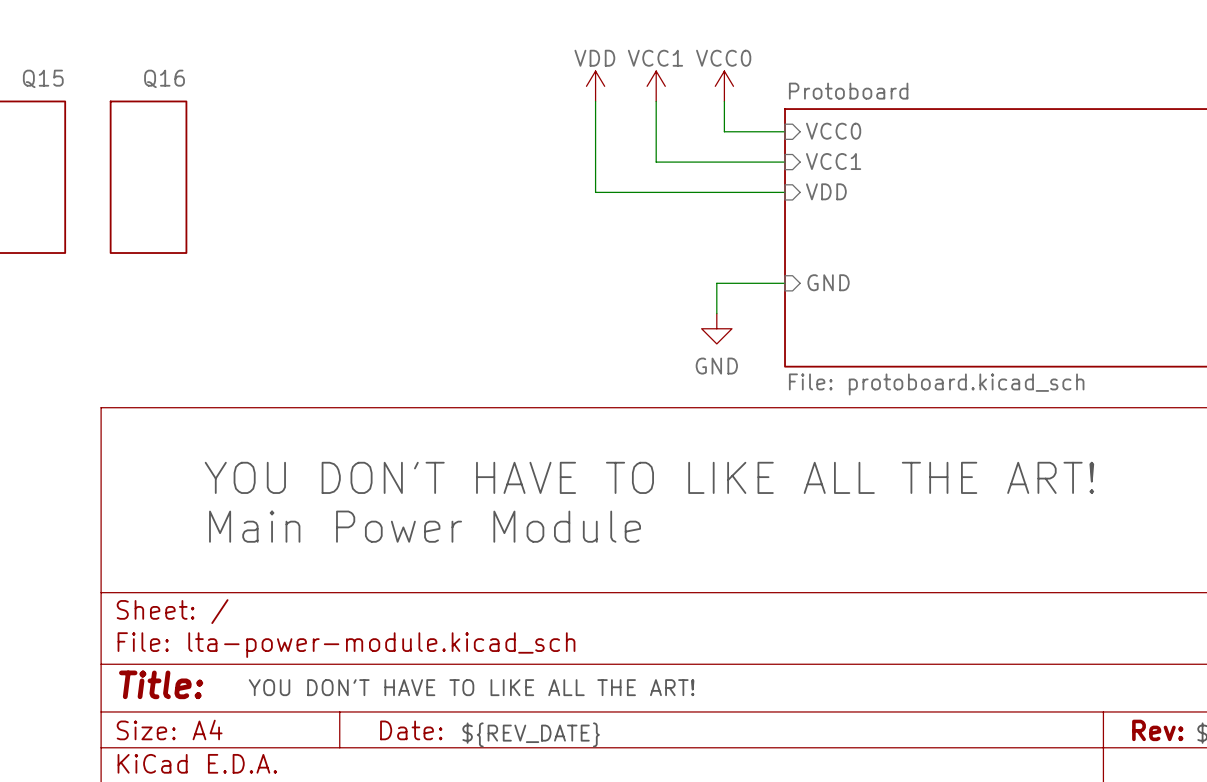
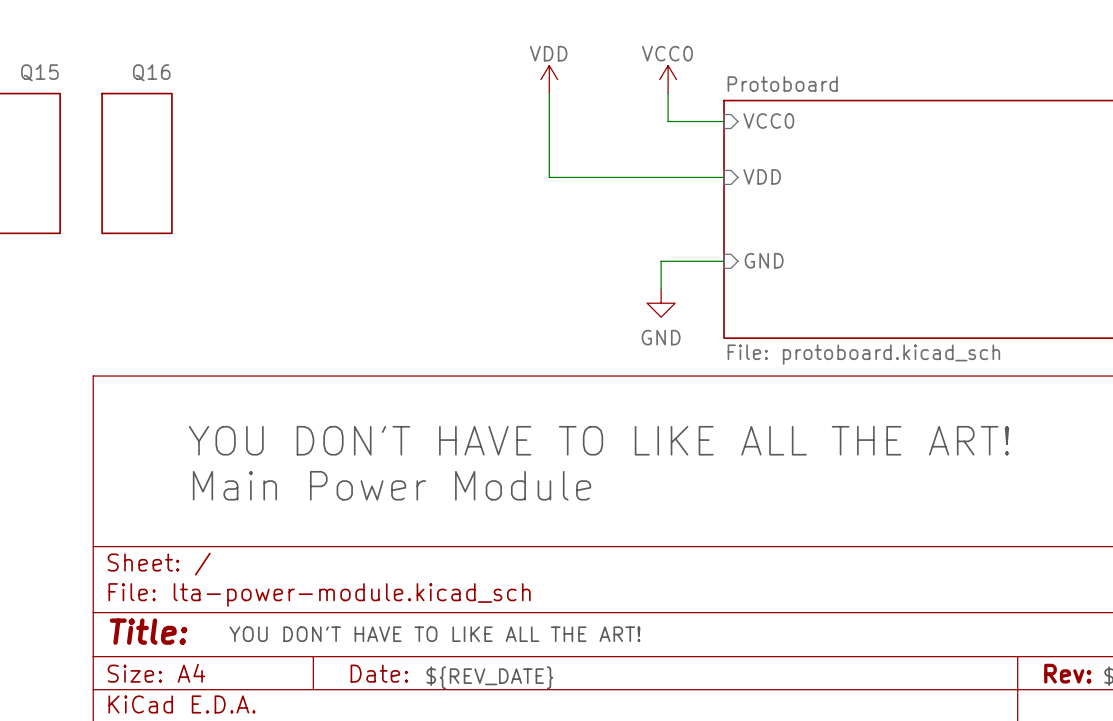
power symbol: VCC1 (656, 86) -> none
wire: (656, 101) (656, 162) (785, 162) -> none
sheet pin: VCC1 (833, 161) -> none

